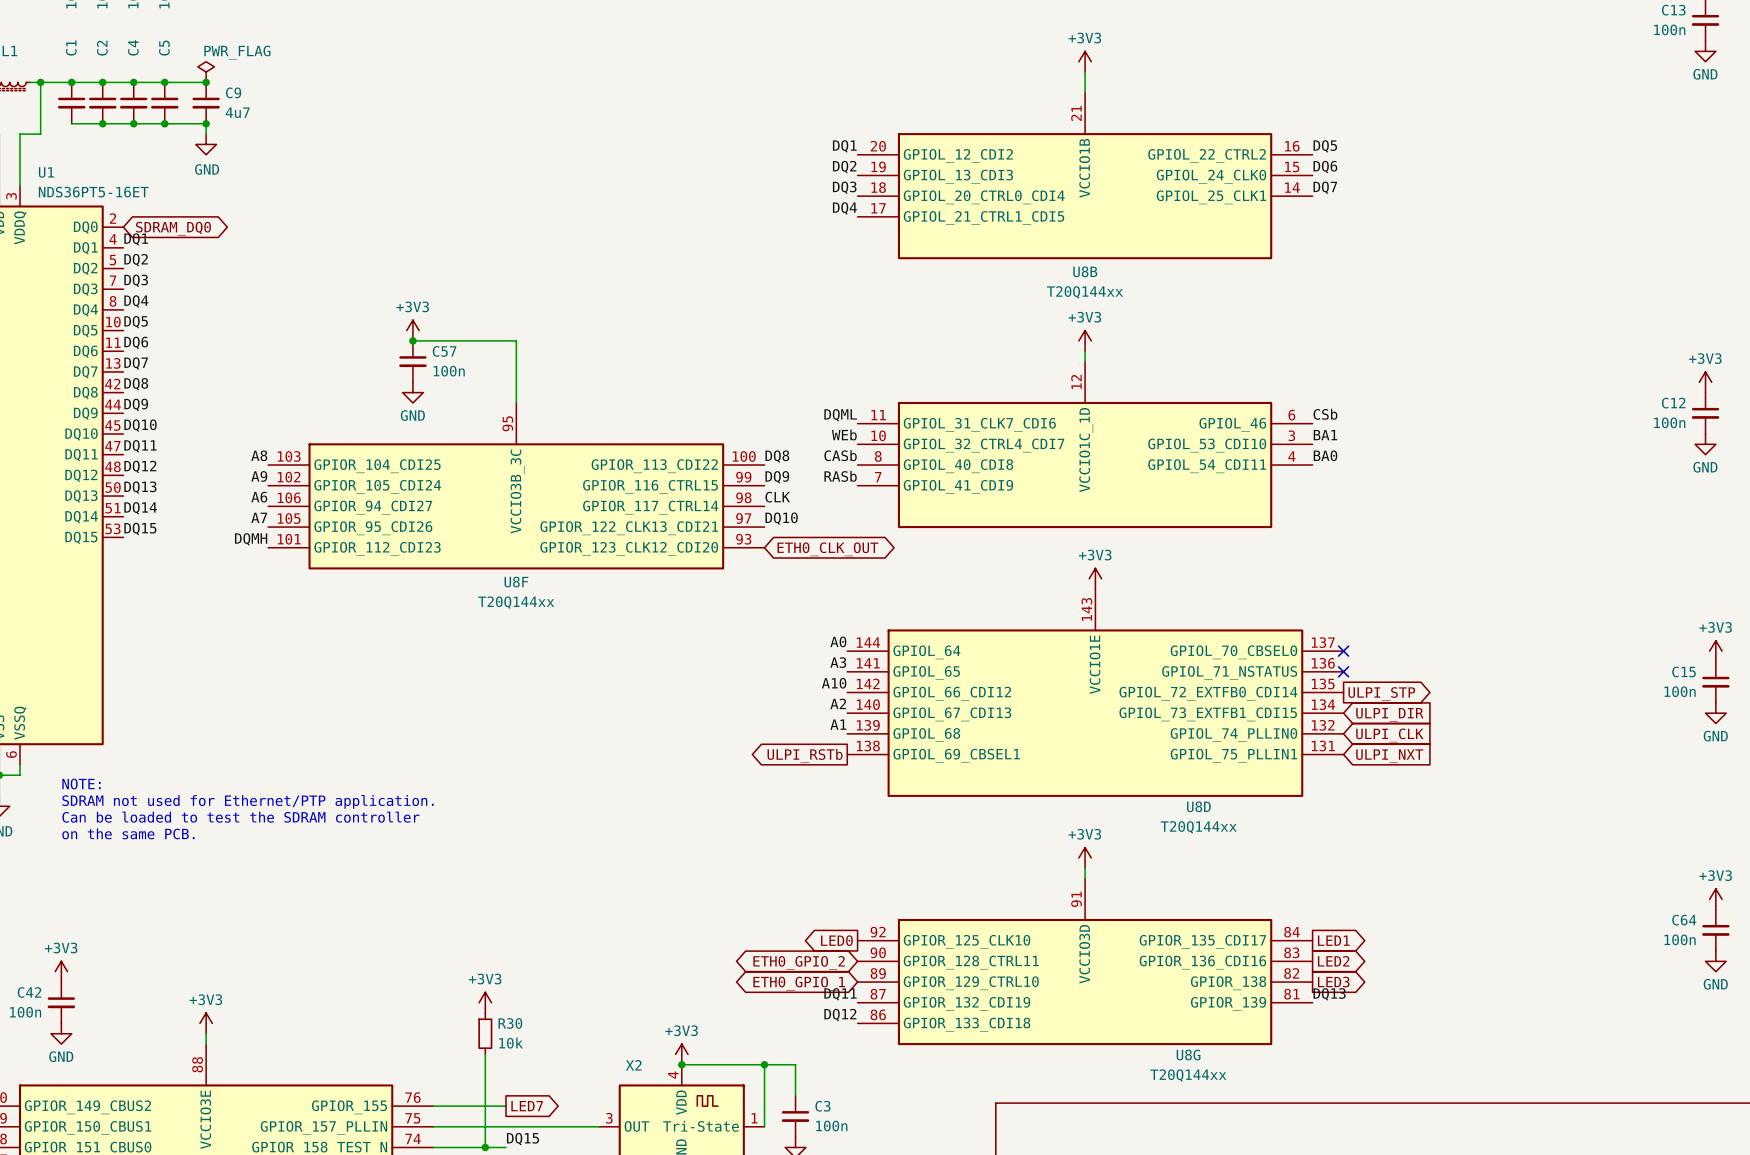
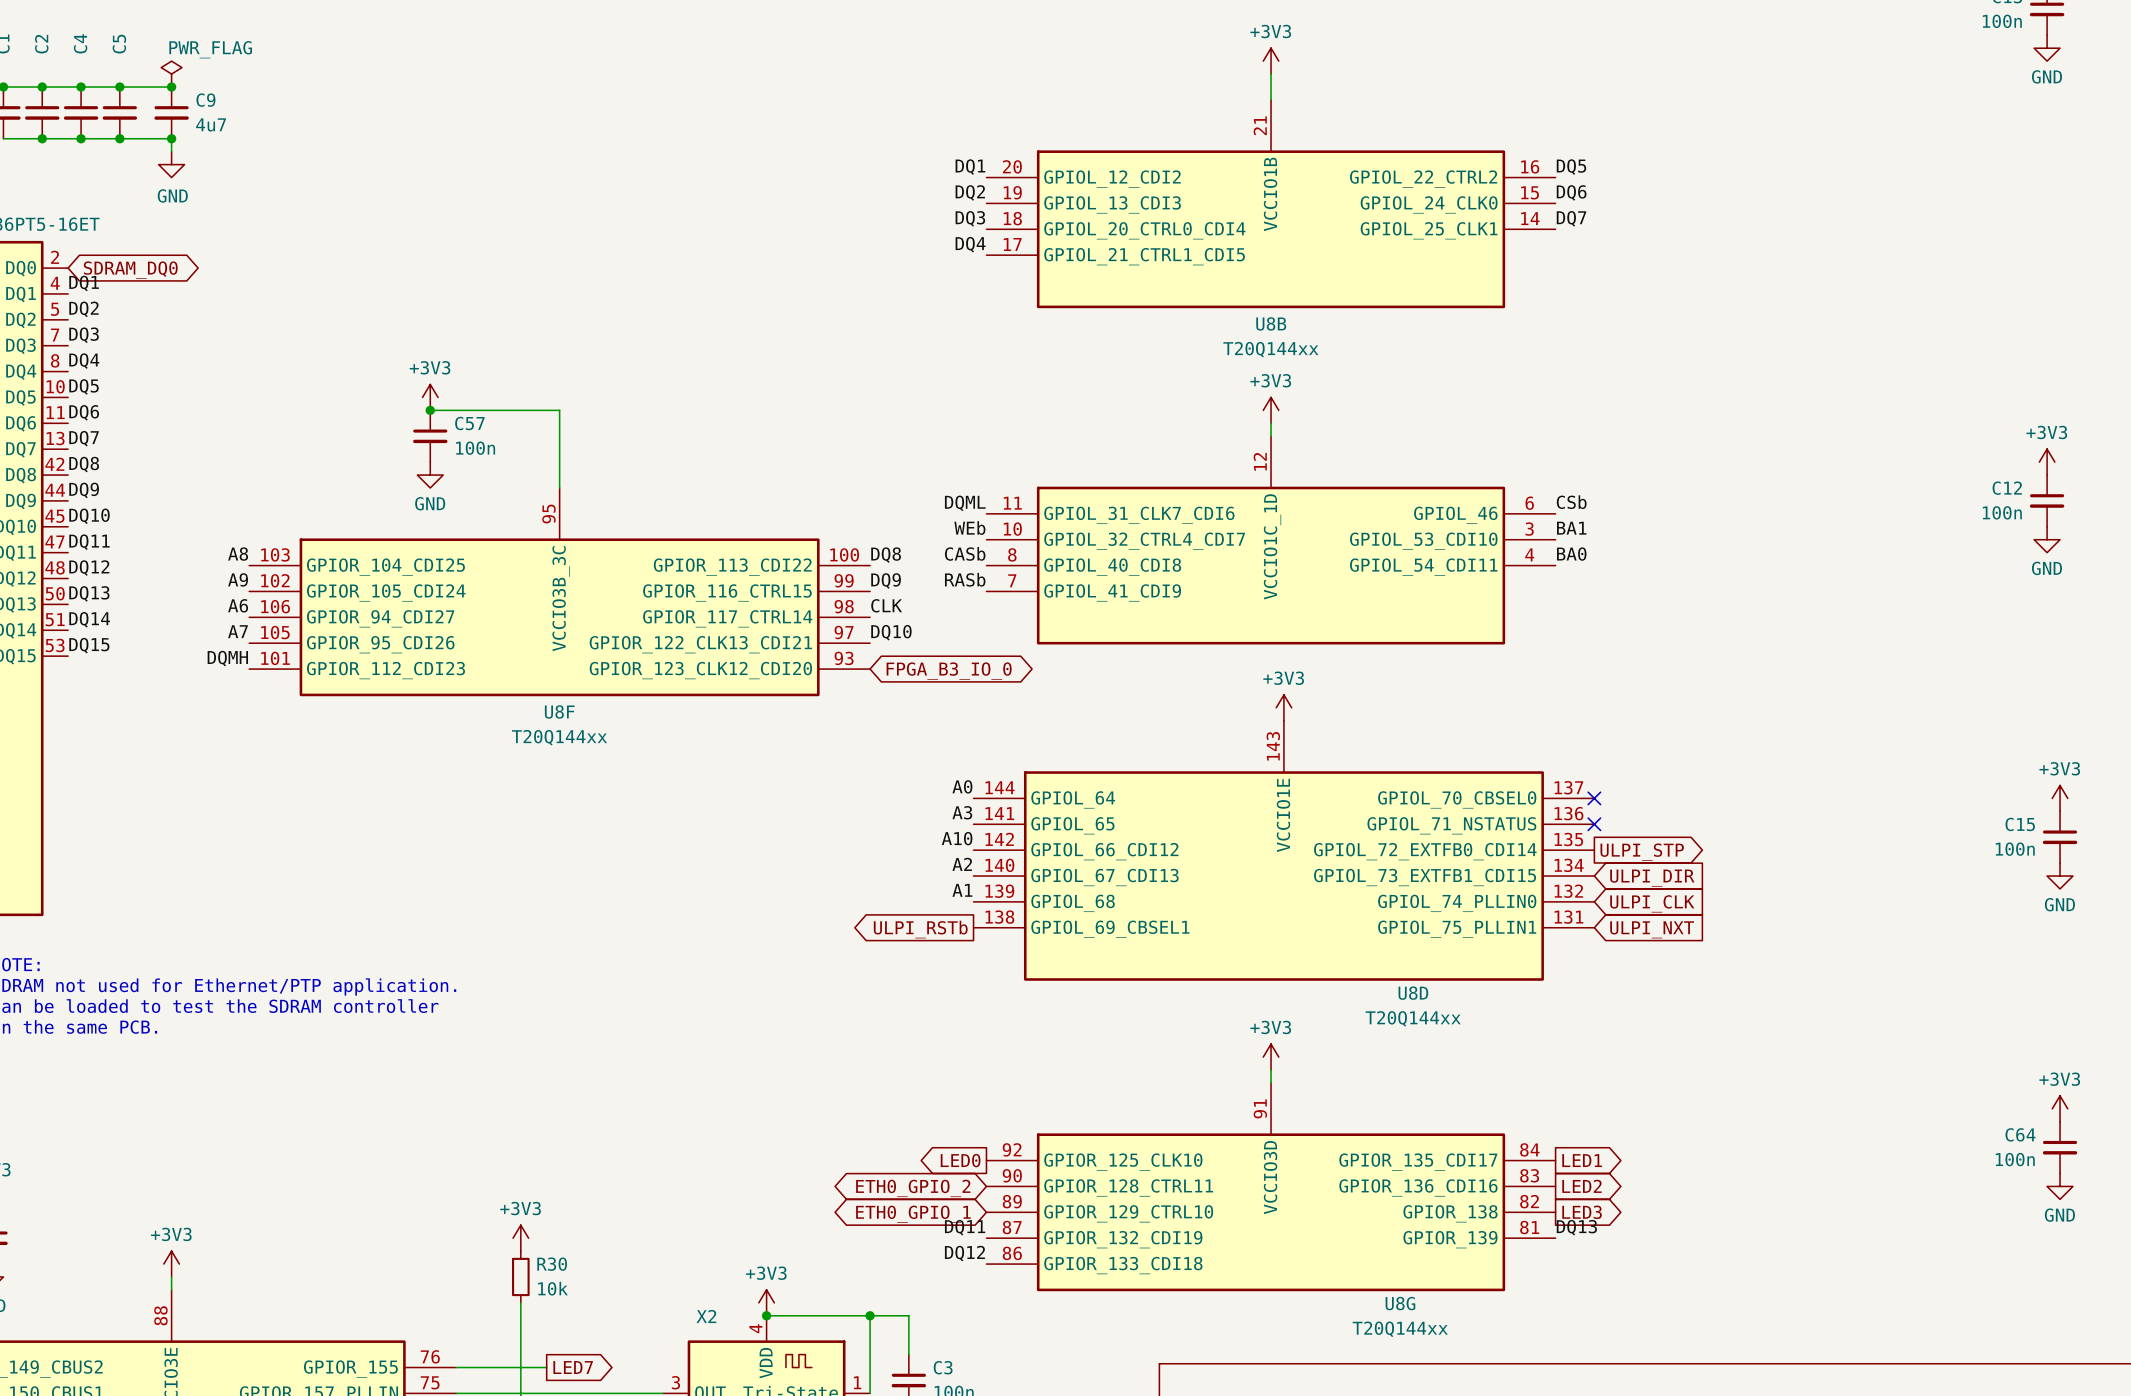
global label: ETH0_CLK_OUT (827, 549) -> FPGA_B3_IO_0 (949, 671)

